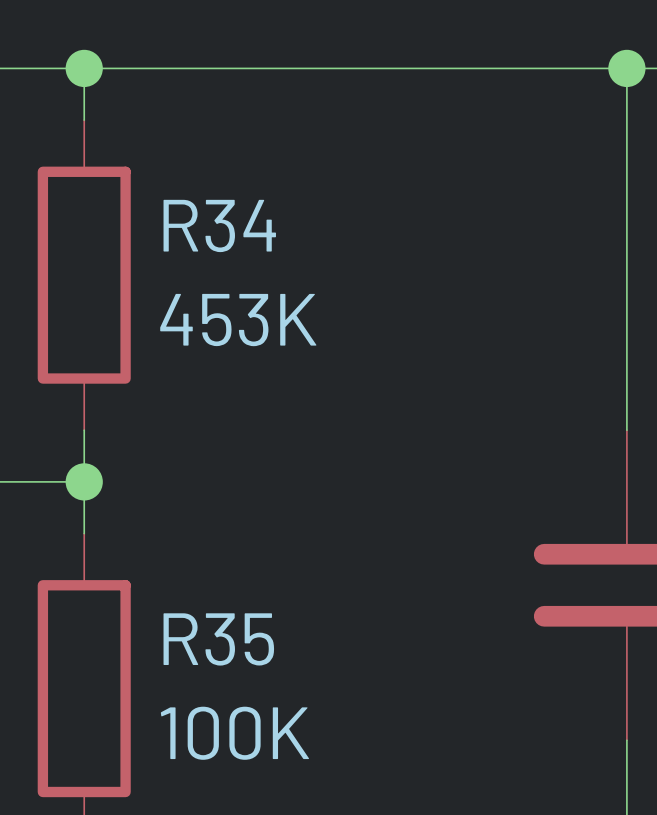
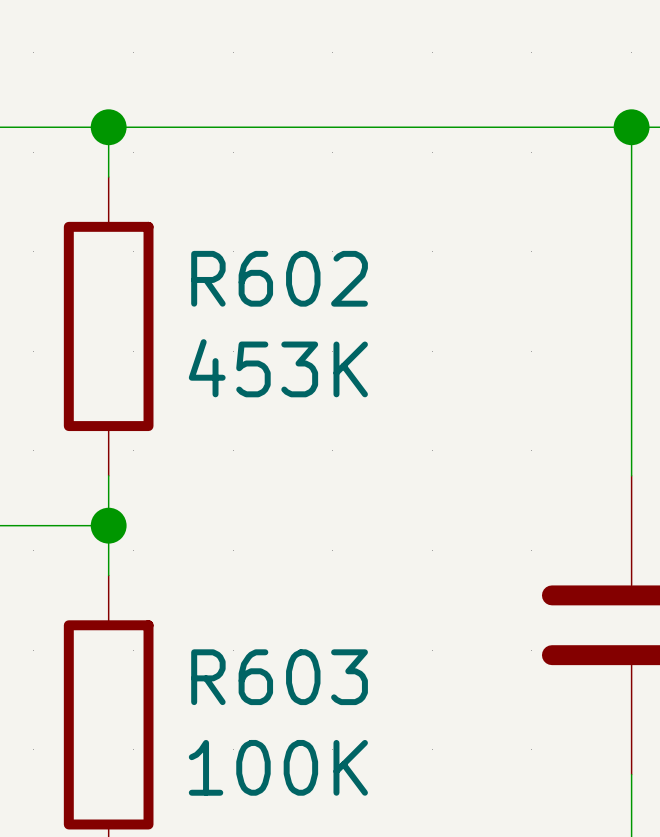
R34 name: R34 (219, 225) -> R602 (279, 278)
R35 name: R35 (218, 639) -> R603 (279, 677)

